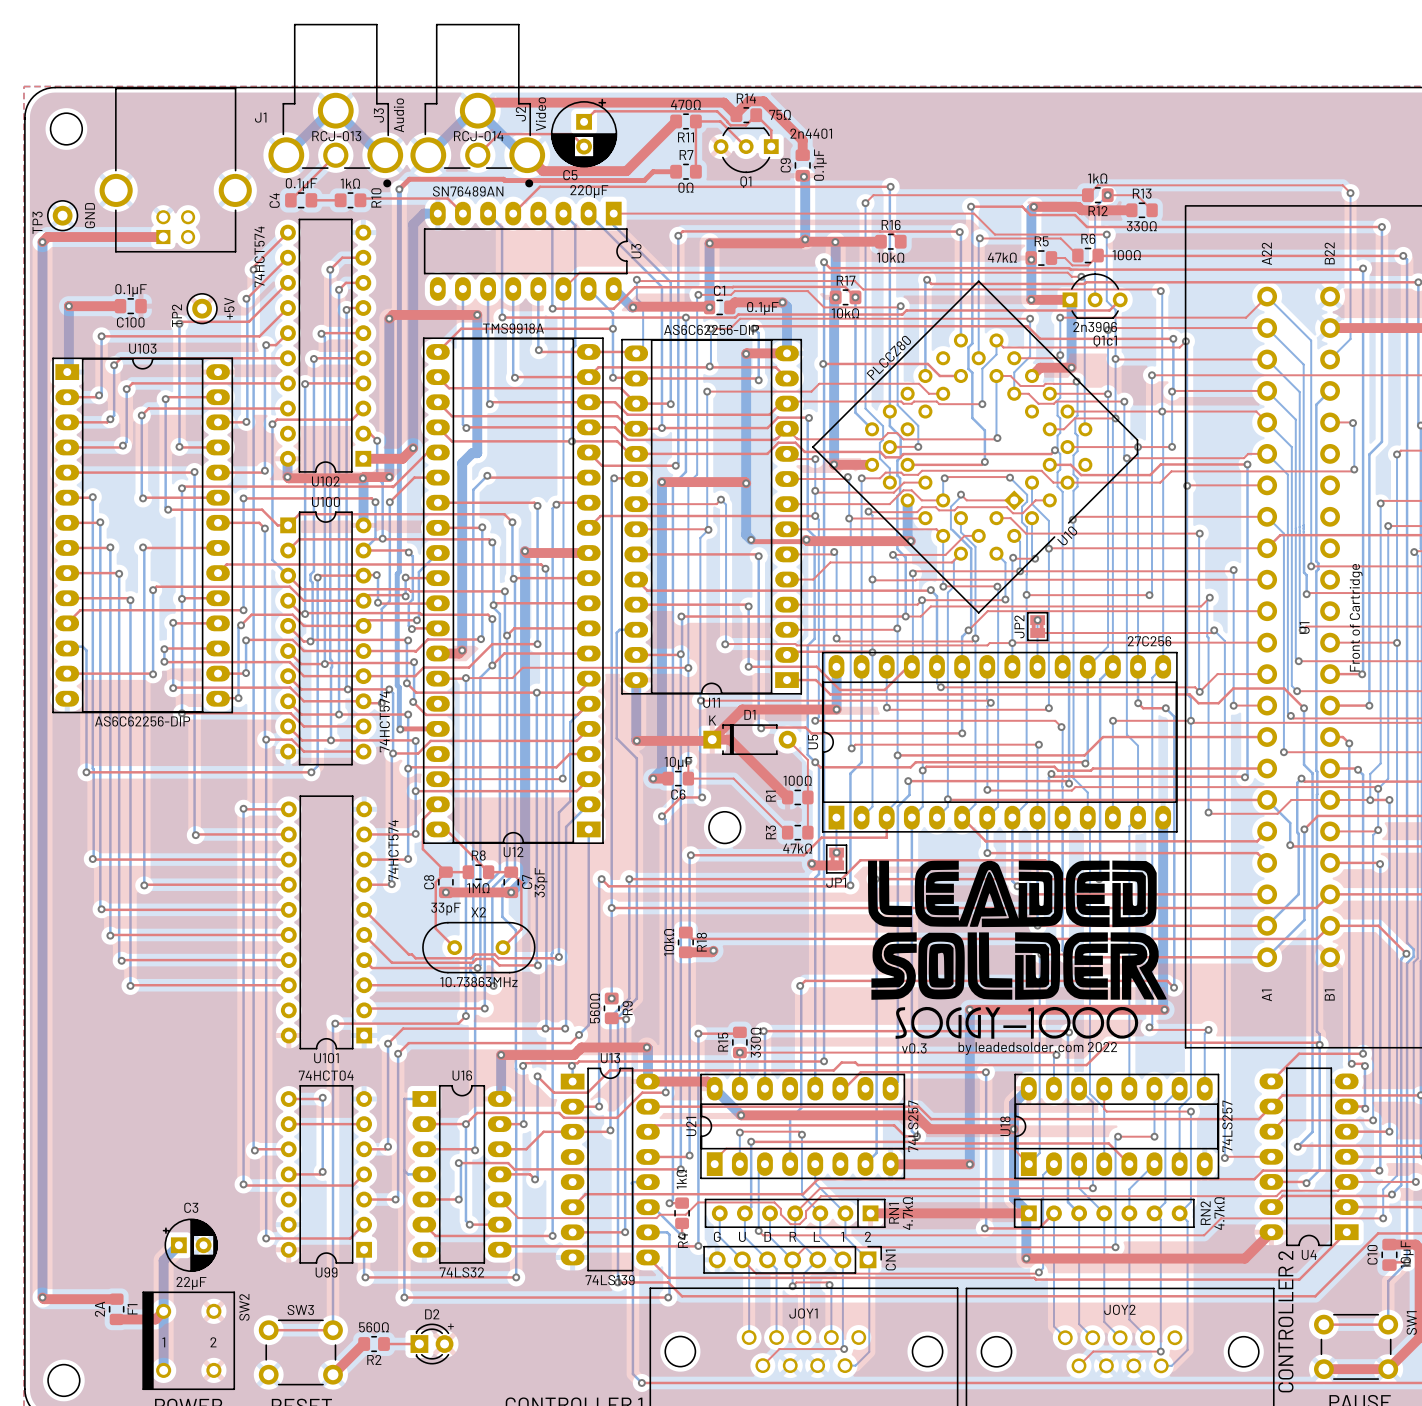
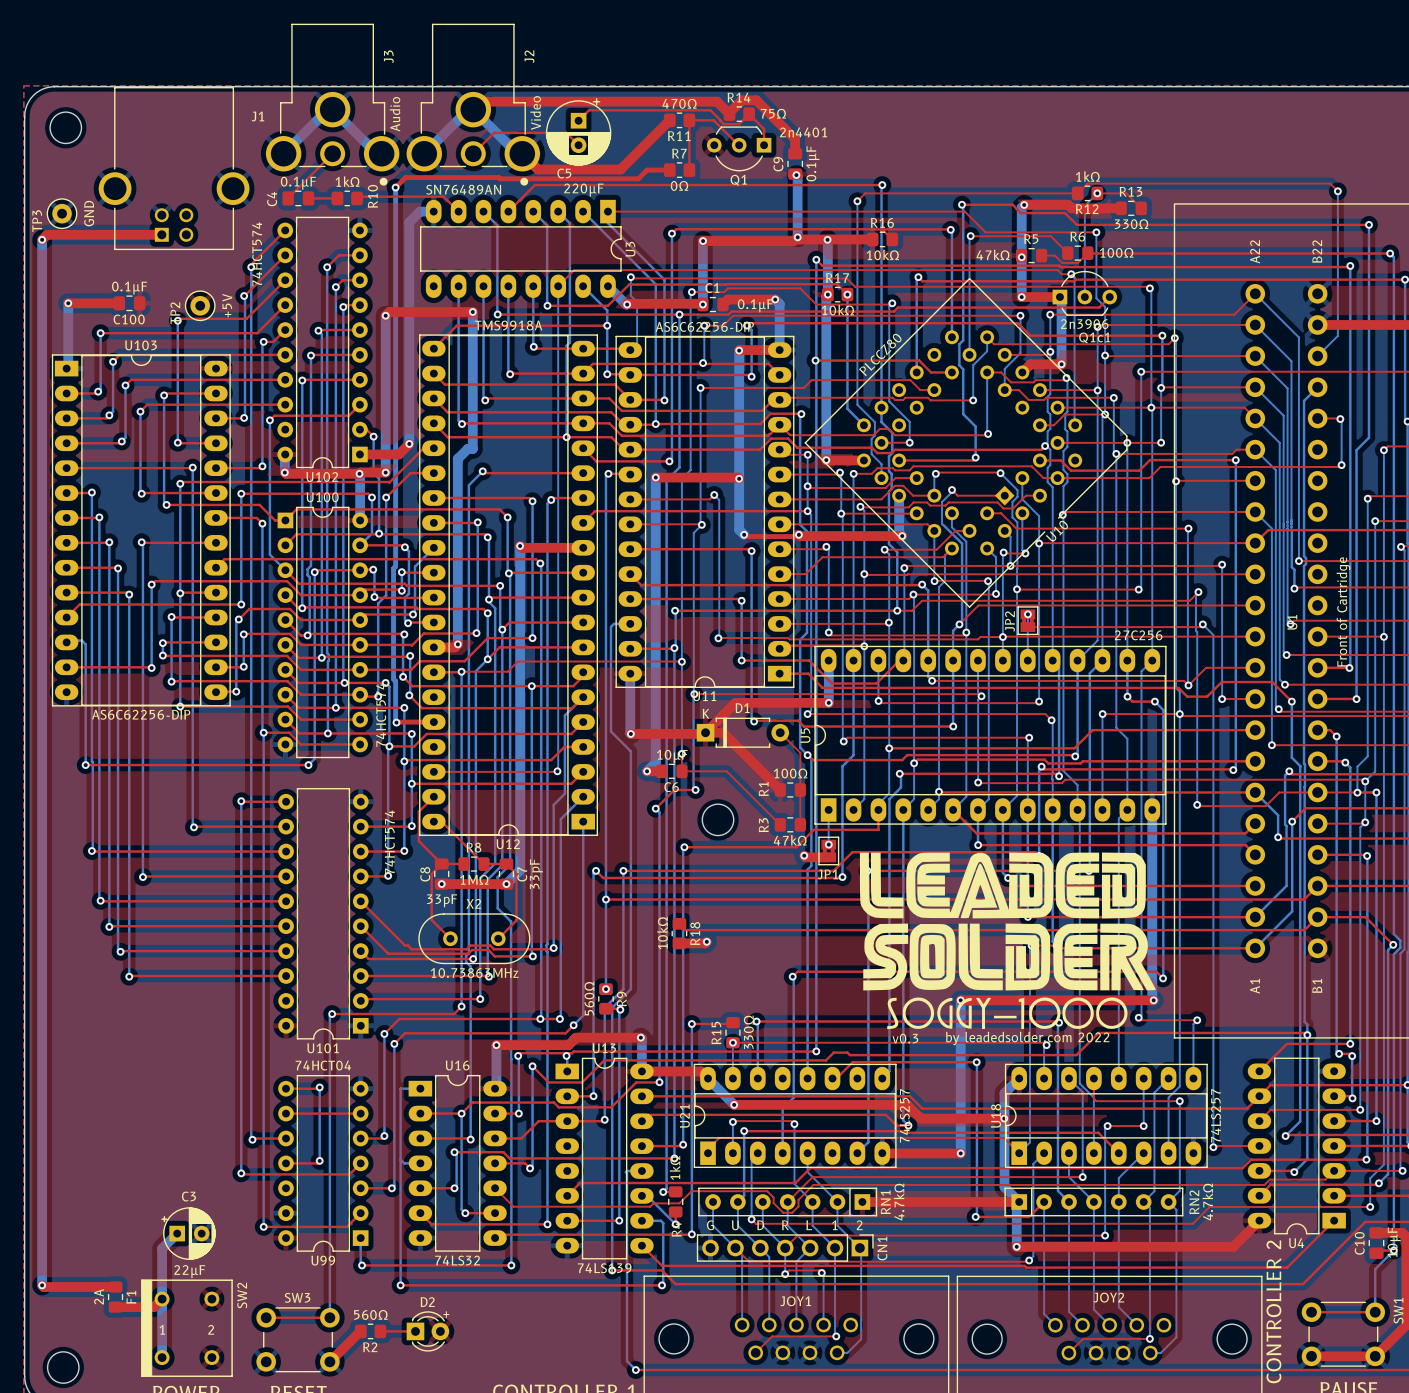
J2 name position: J2 (520, 114) -> J2 (529, 56)
J3 name position: J3 (378, 115) -> J3 (388, 56)
J3 value: RCJ-013 (336, 136) -> none
J2 value: RCJ-014 (478, 136) -> none

